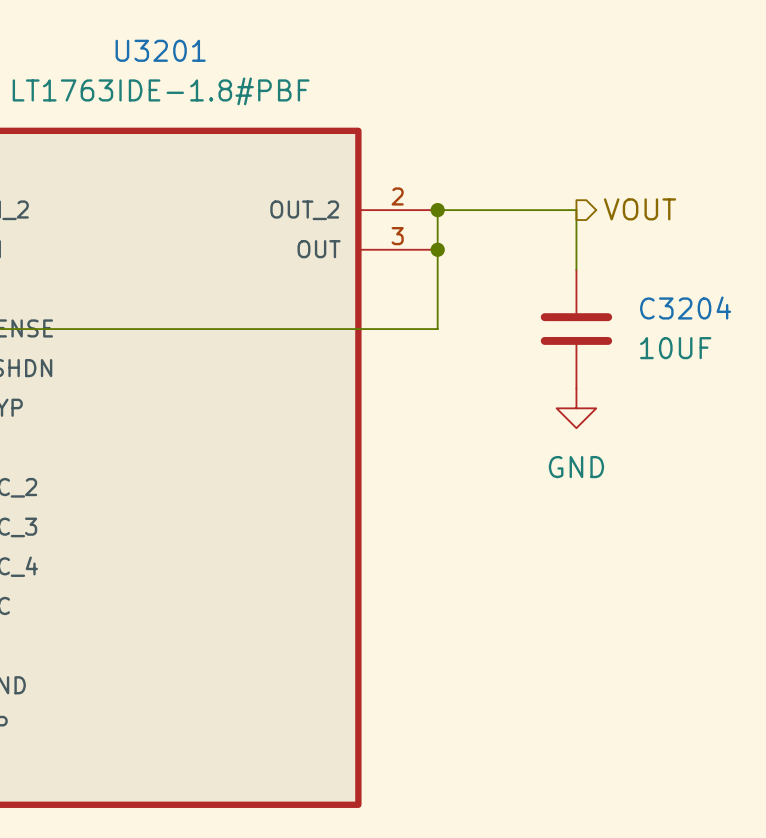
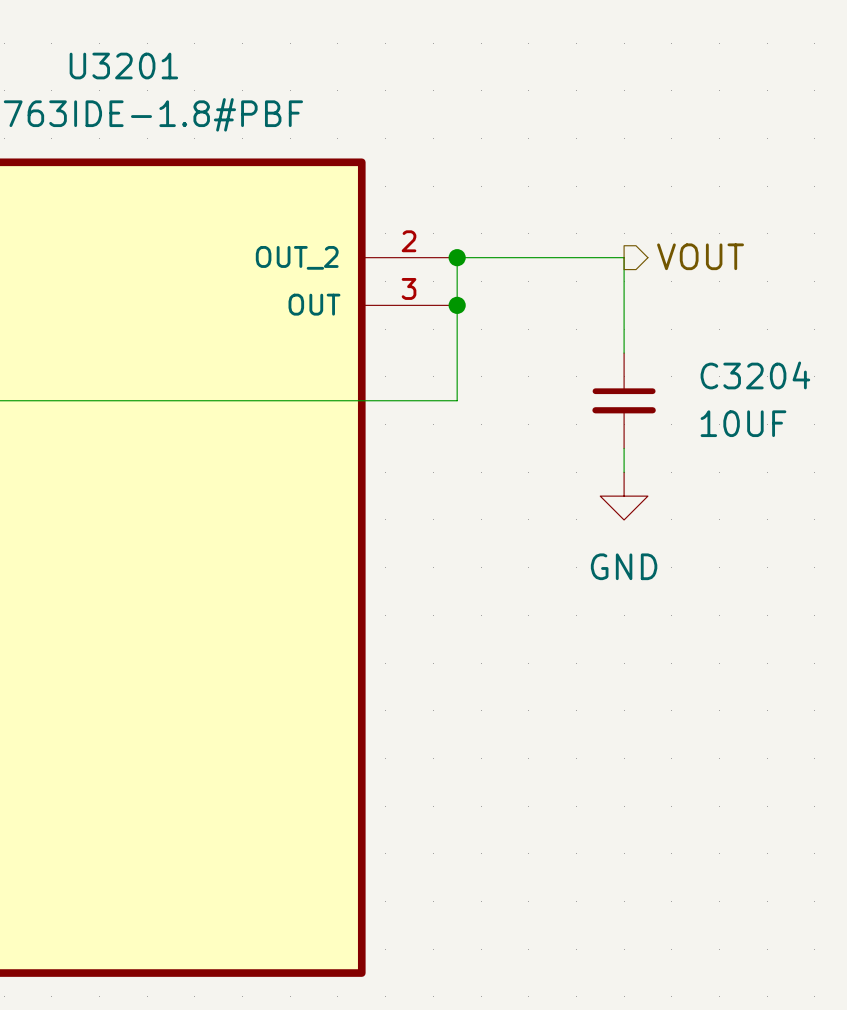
C3204 symbol: [540, 269, 613, 389] -> [592, 353, 656, 449]

